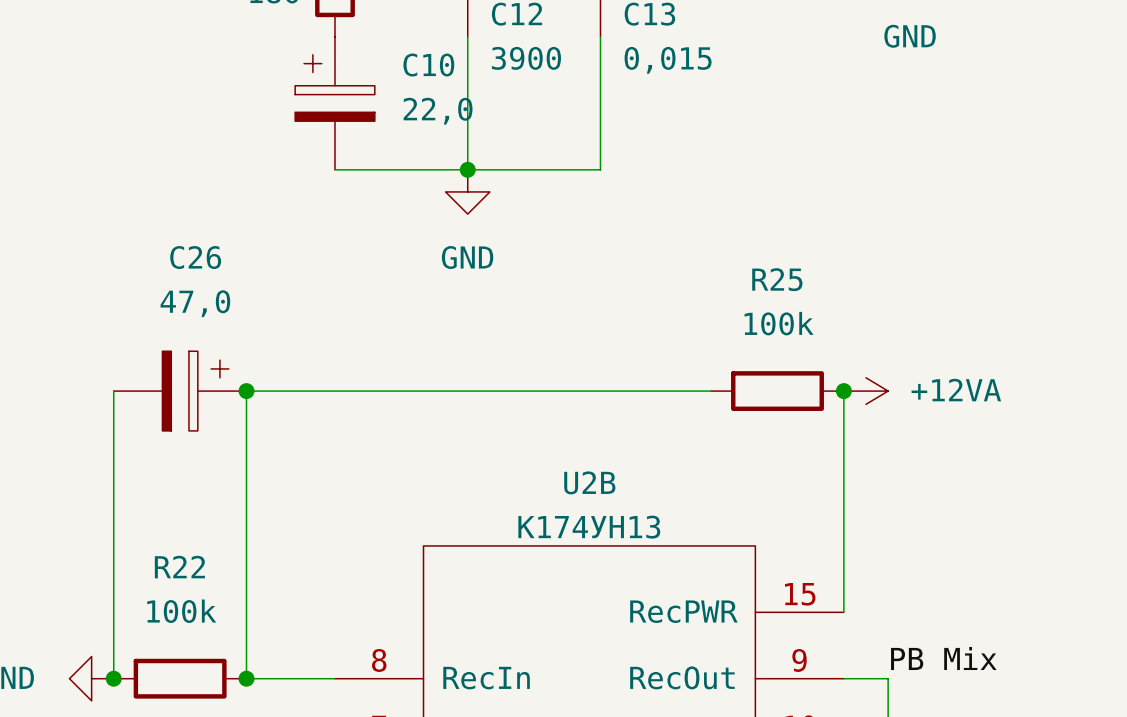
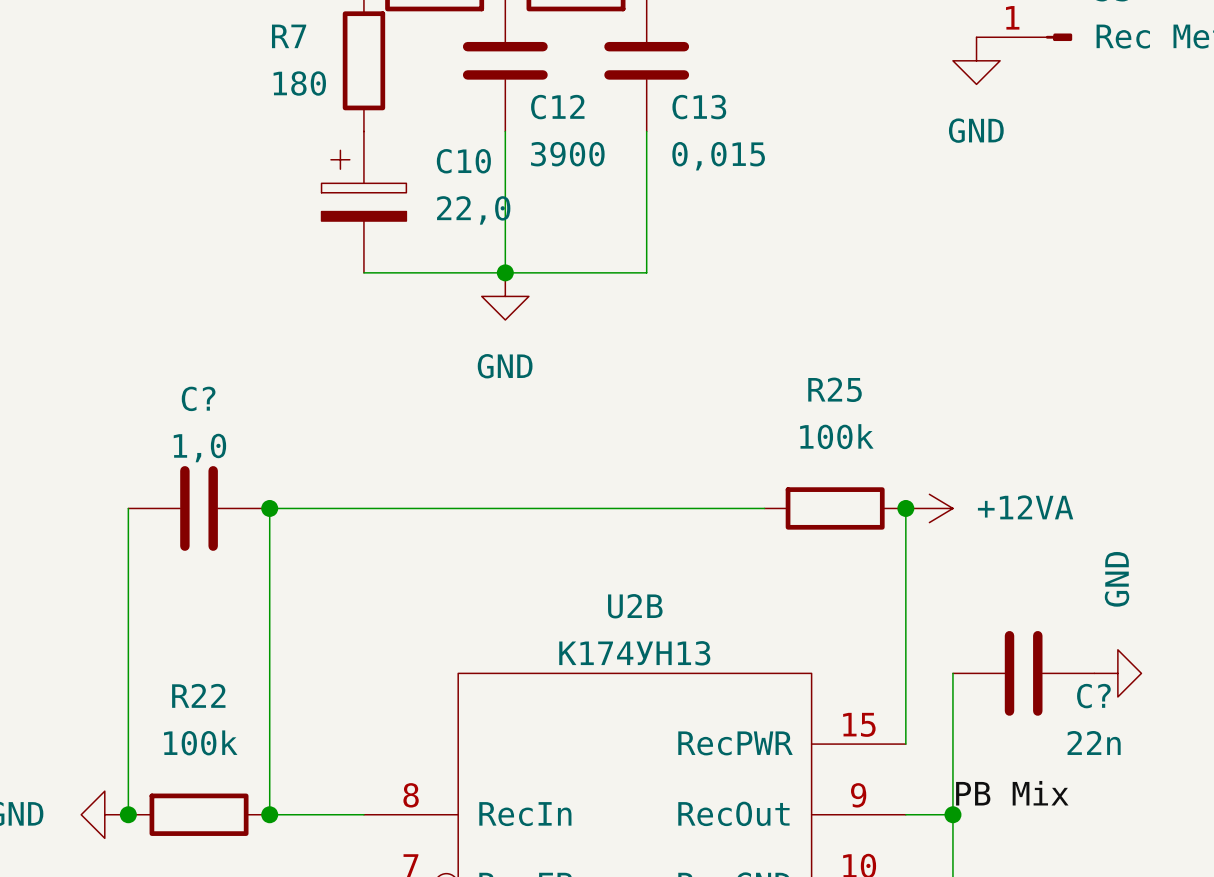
C26: 47,0 (180, 391) -> none
C?: none -> 1,0 (199, 508)
wire: none -> (952, 673) (952, 814)
C?: none -> 22n (1023, 673)
power symbol: none -> GND (1117, 673)
junction: none -> (952, 814)

